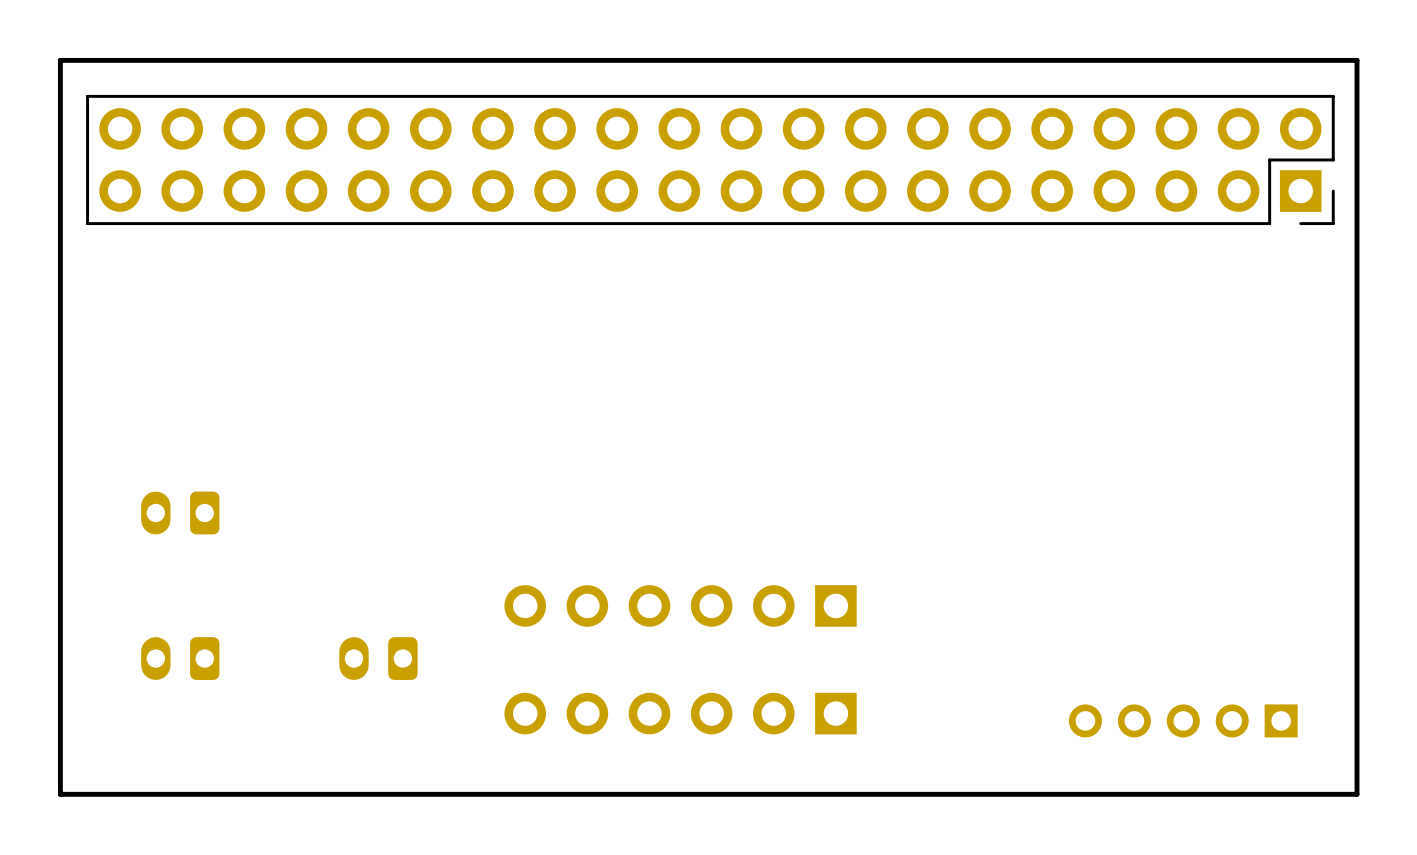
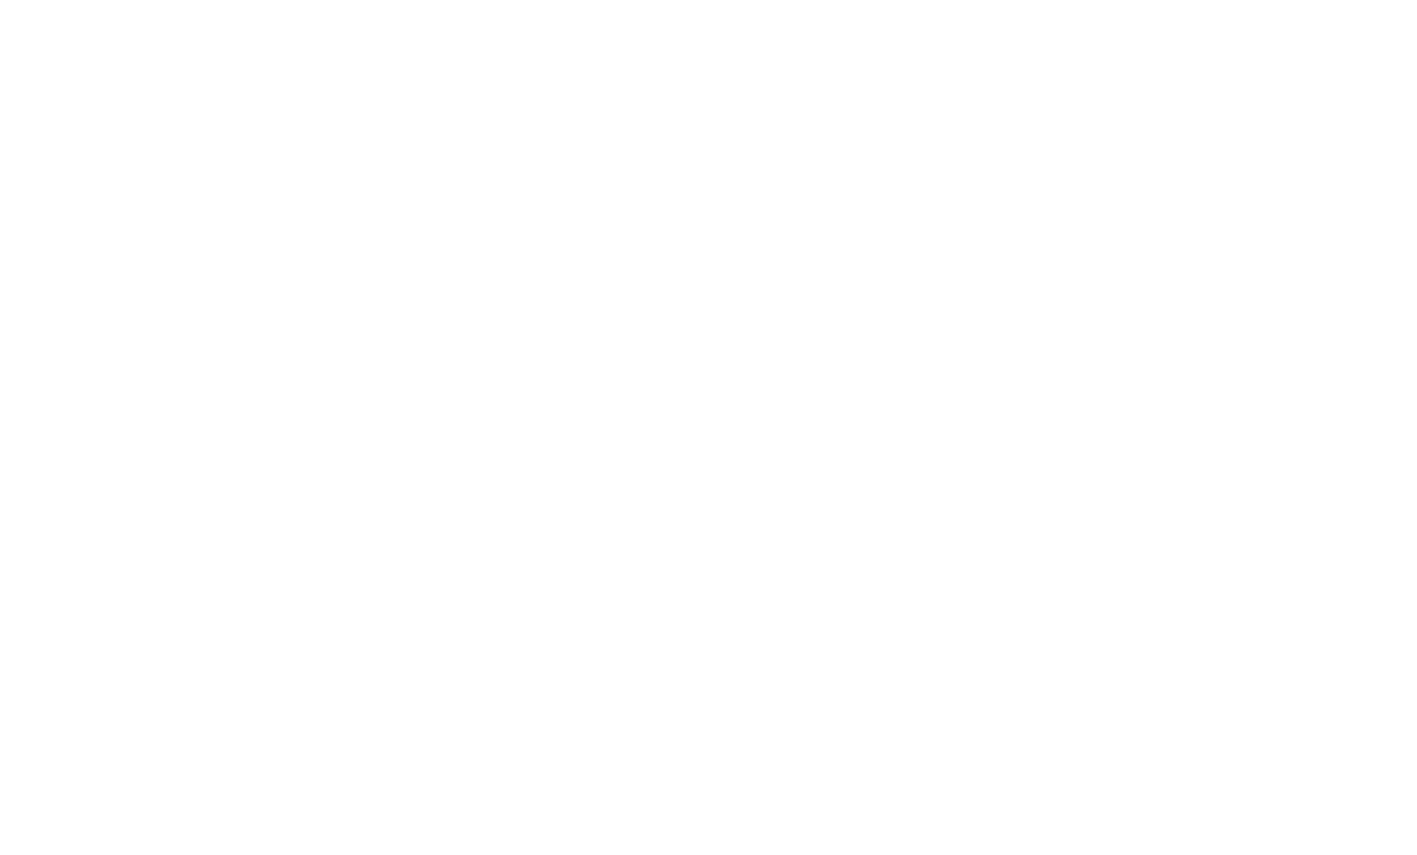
board edge: (1356, 60) (60, 60) (60, 794) (1356, 794) (1356, 60) -> none
part: (710, 159) -> none
part: (180, 512) -> none
part: (680, 605) -> none
part: (180, 658) -> none
part: (378, 658) -> none
part: (680, 713) -> none
part: (1183, 720) -> none

